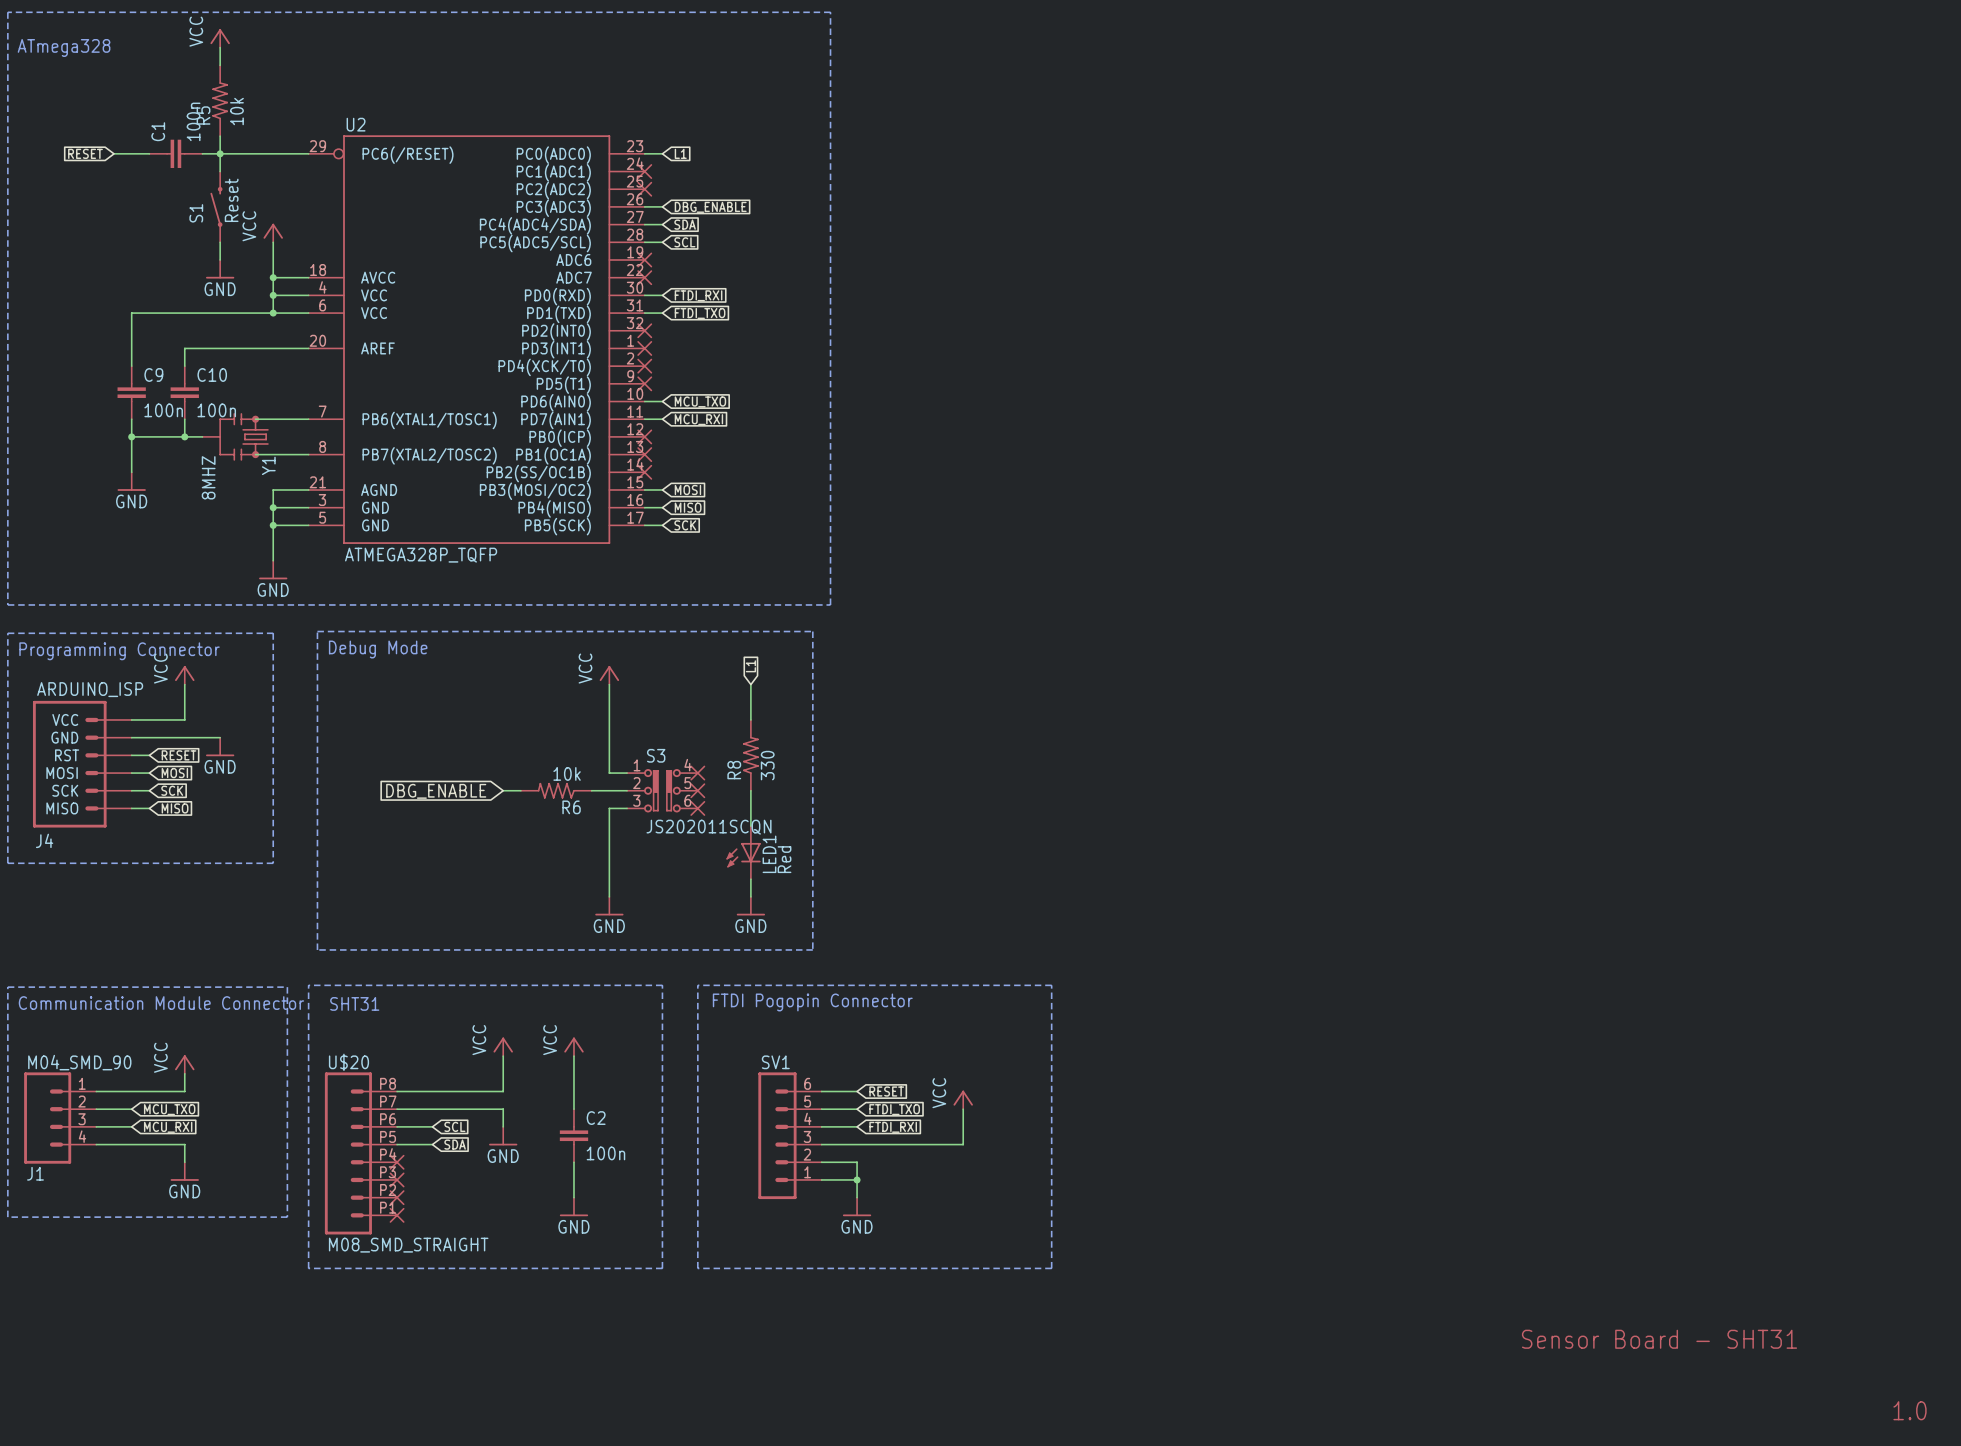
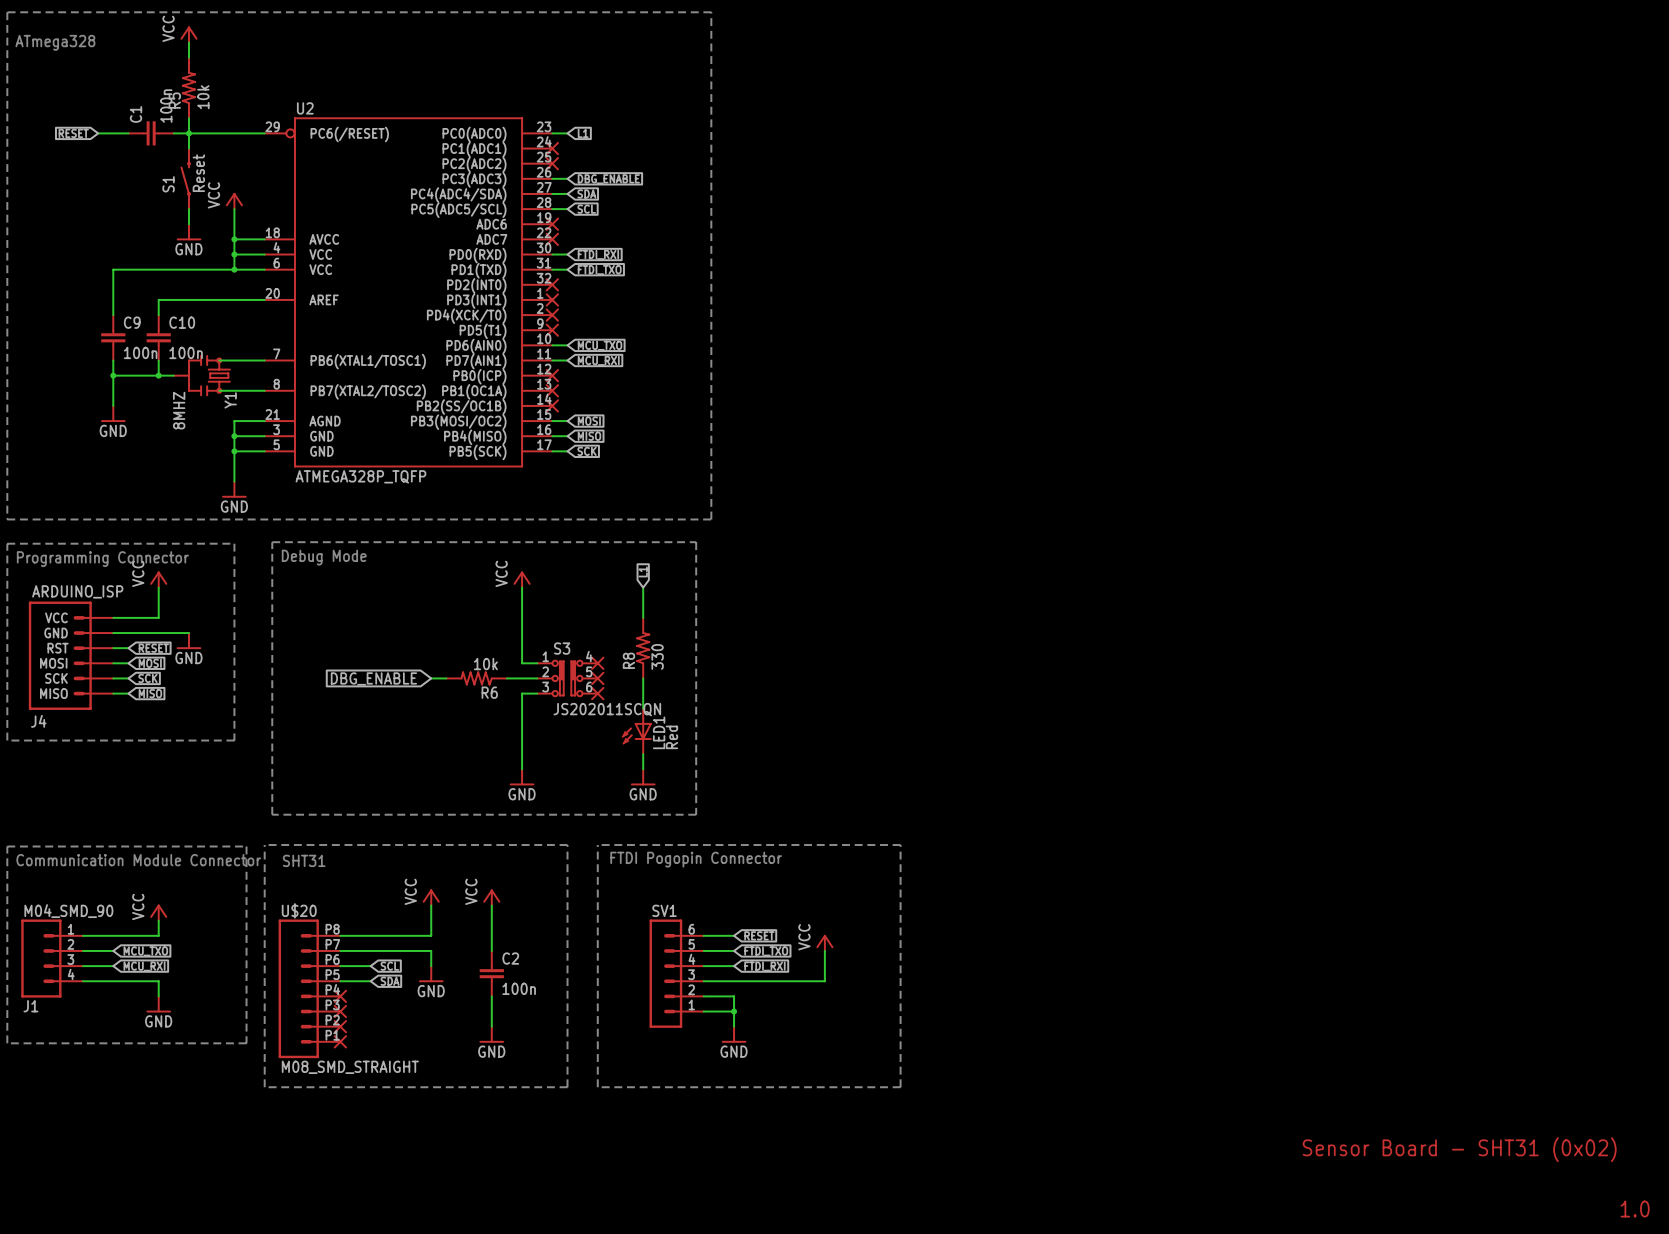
text: Sensor Board - SHT31 (1659, 1339) -> Sensor Board - SHT31 (0x02) (1459, 1149)

